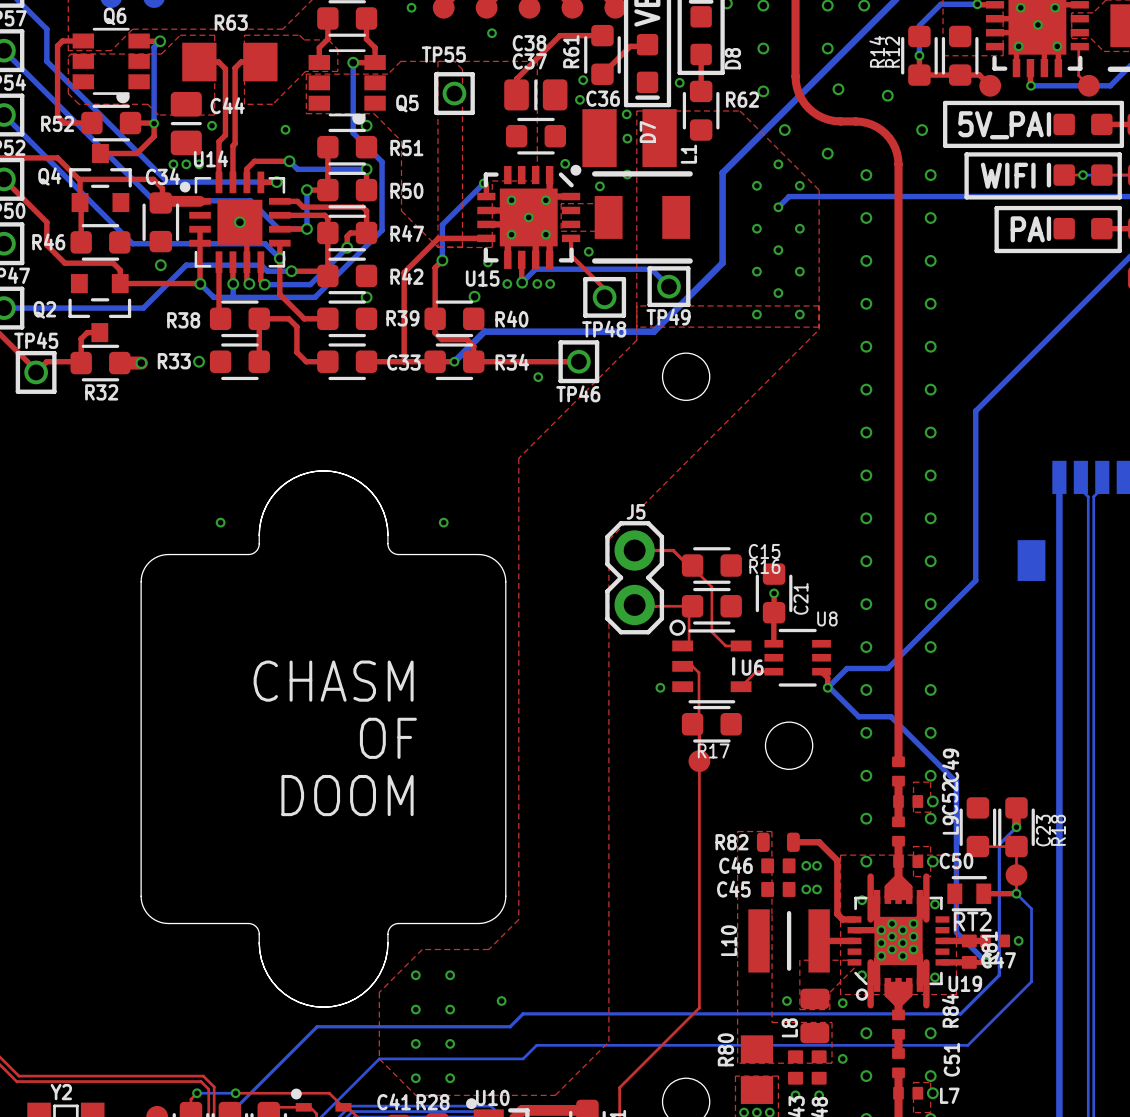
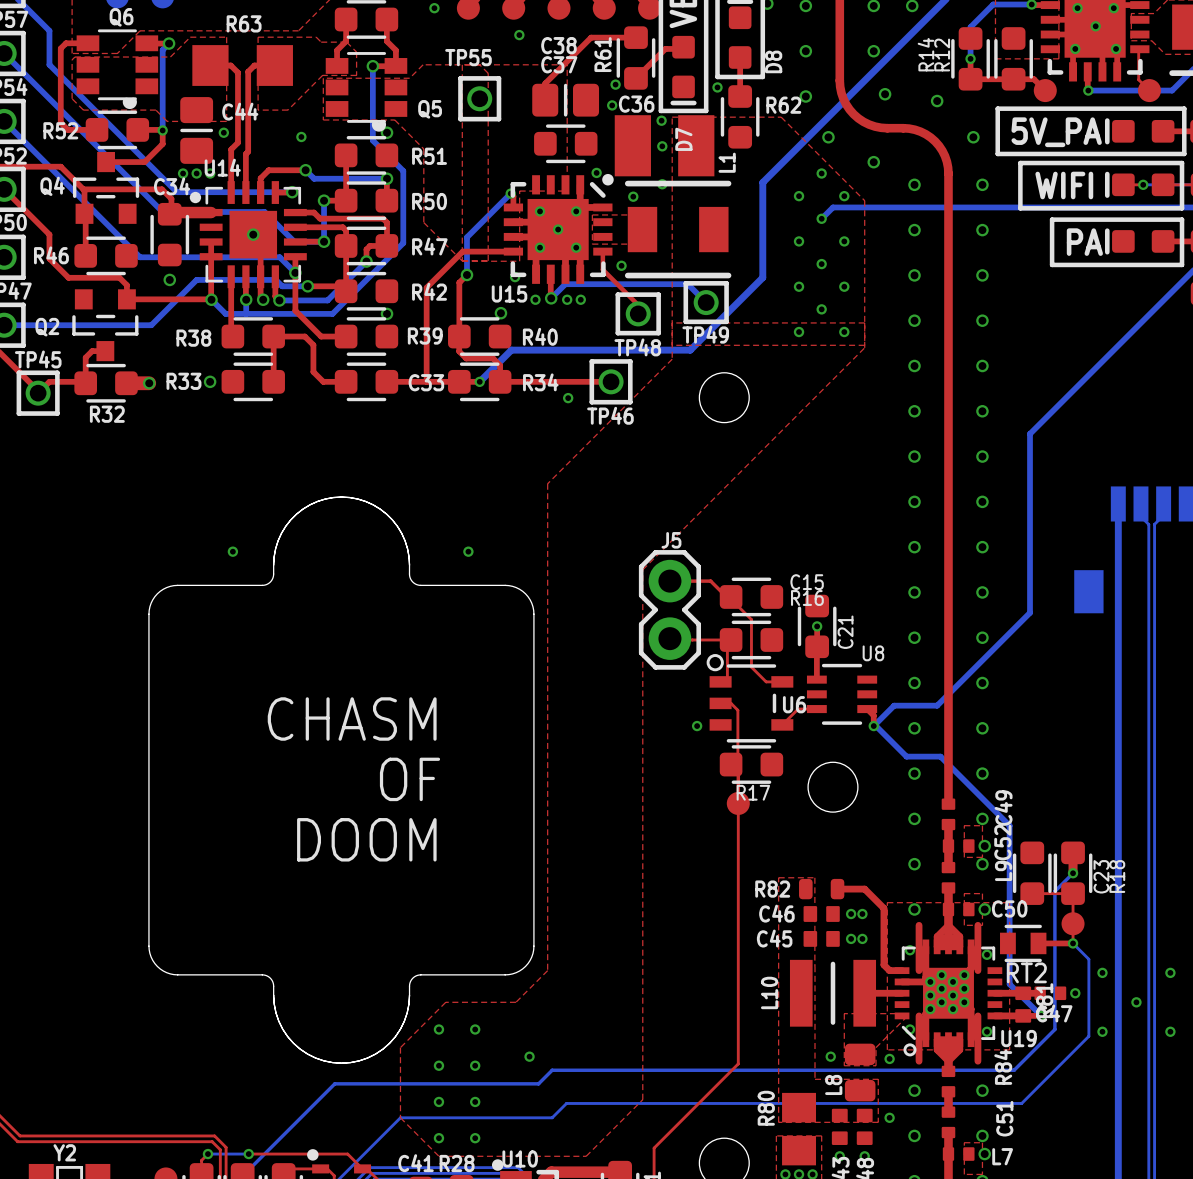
via: none -> (1102, 972)
via: none -> (1170, 972)
via: none -> (1136, 1002)
via: none -> (1102, 1031)
via: none -> (1170, 1031)

